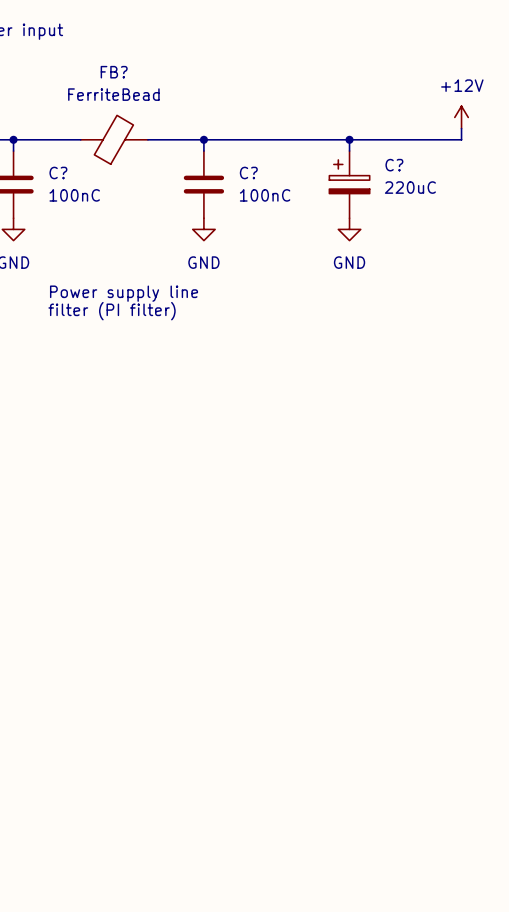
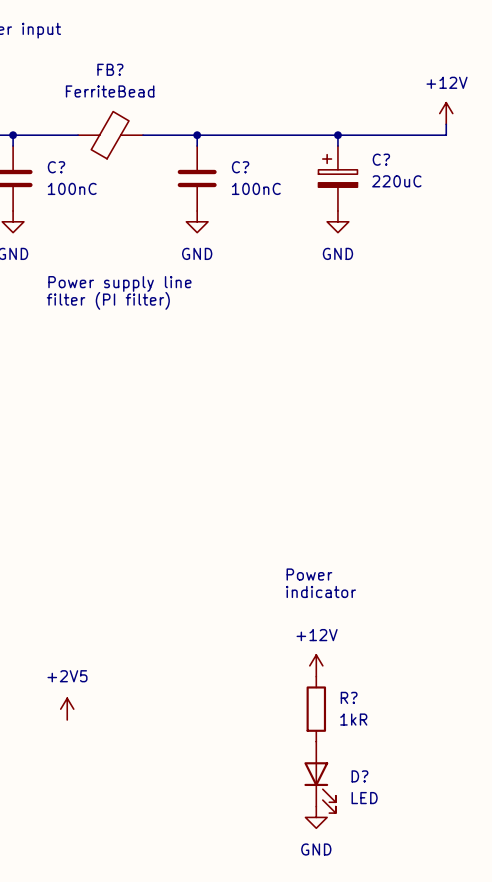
text: none -> Power (309, 574)
text: none -> indicator (321, 591)
power symbol: none -> +12V (316, 665)
power symbol: none -> +2V5 (67, 709)
R?: none -> 1kR (316, 709)
D?: none -> LED (320, 777)
power symbol: none -> GND (316, 817)

